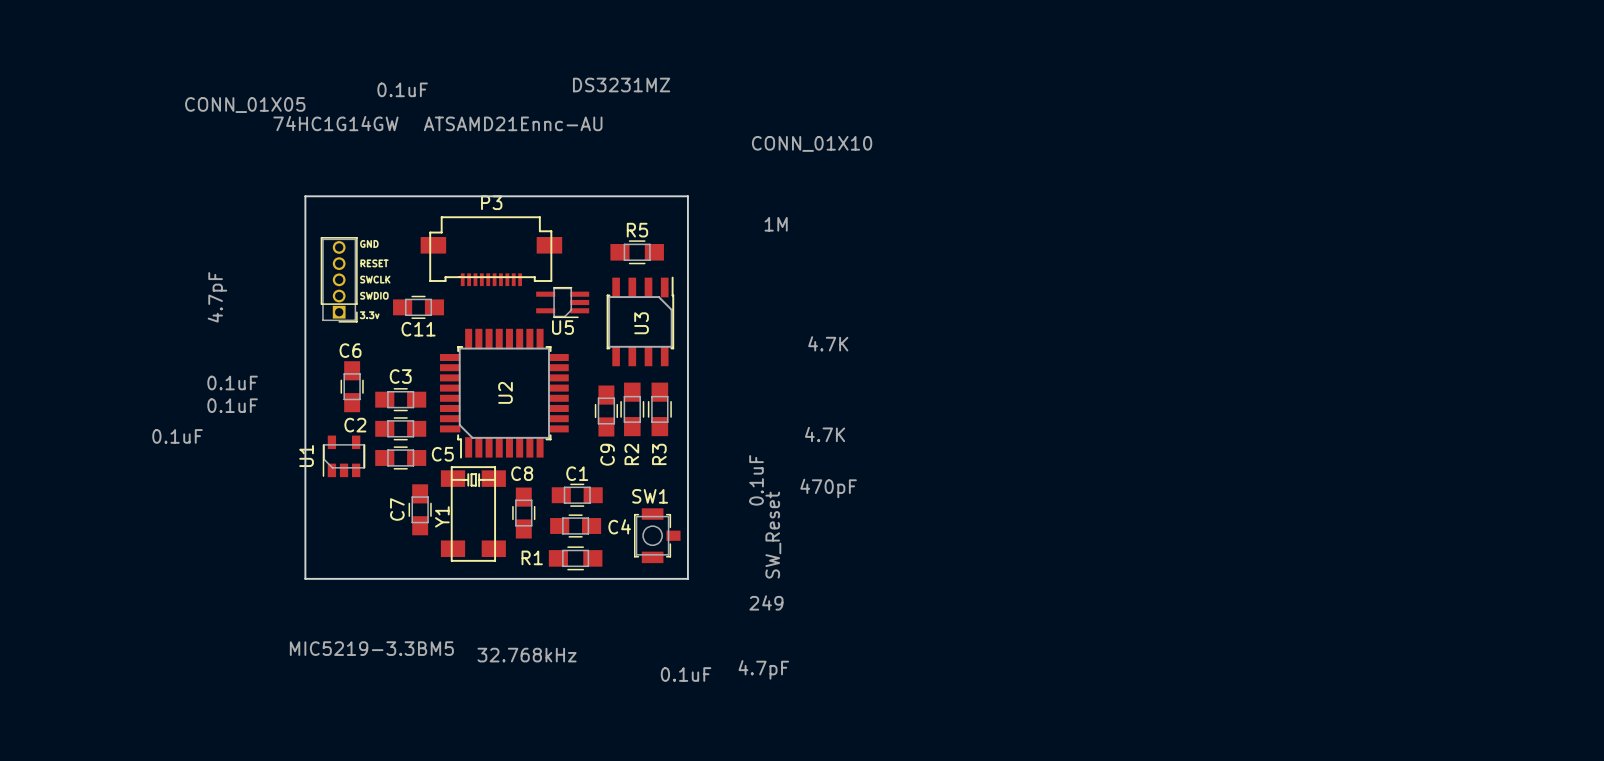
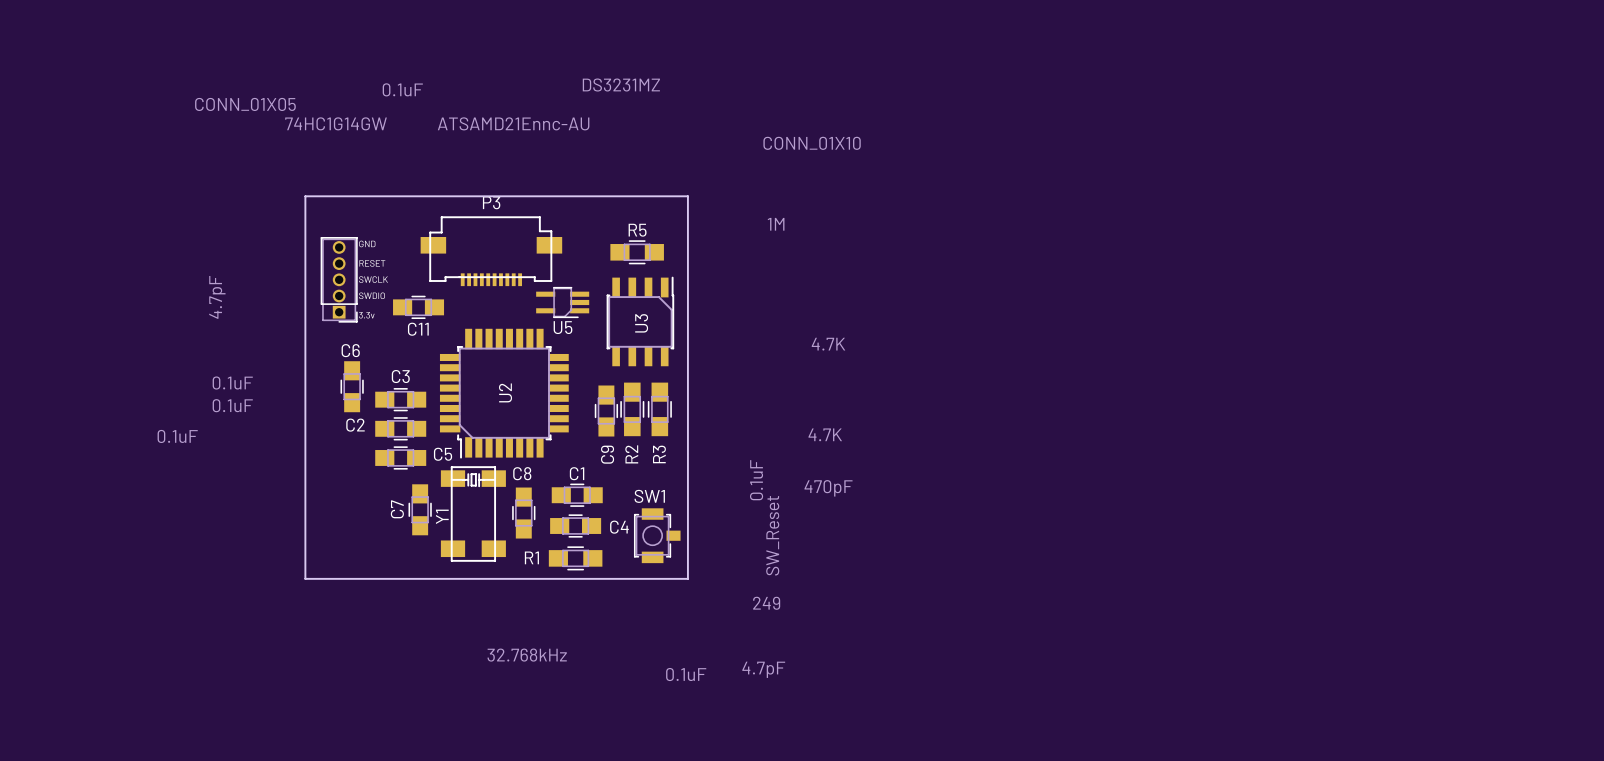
U1: MIC5219-3.3BM5 (344, 456) -> none

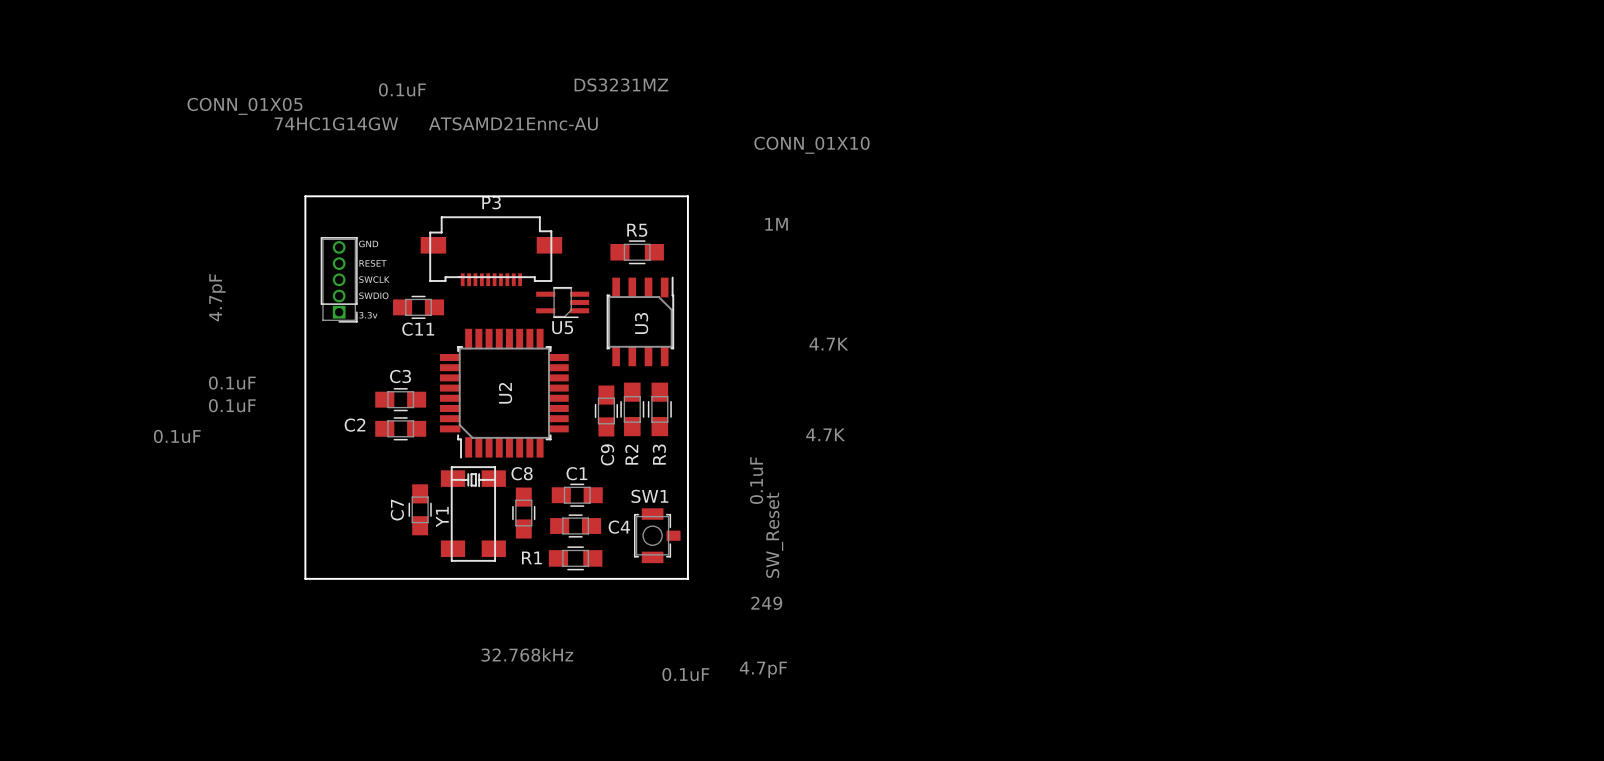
C6: (352, 386) -> none
C5: 470pF (400, 457) -> none

